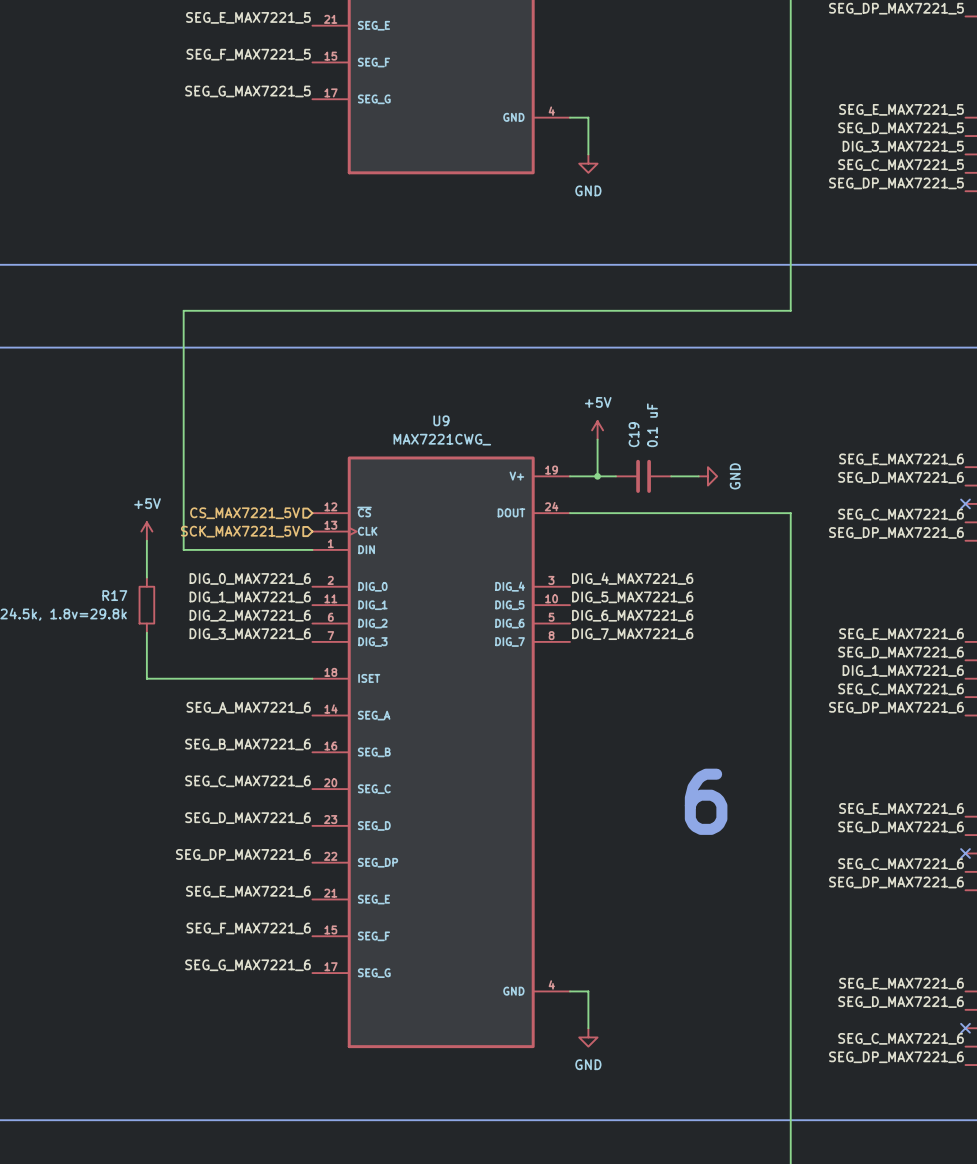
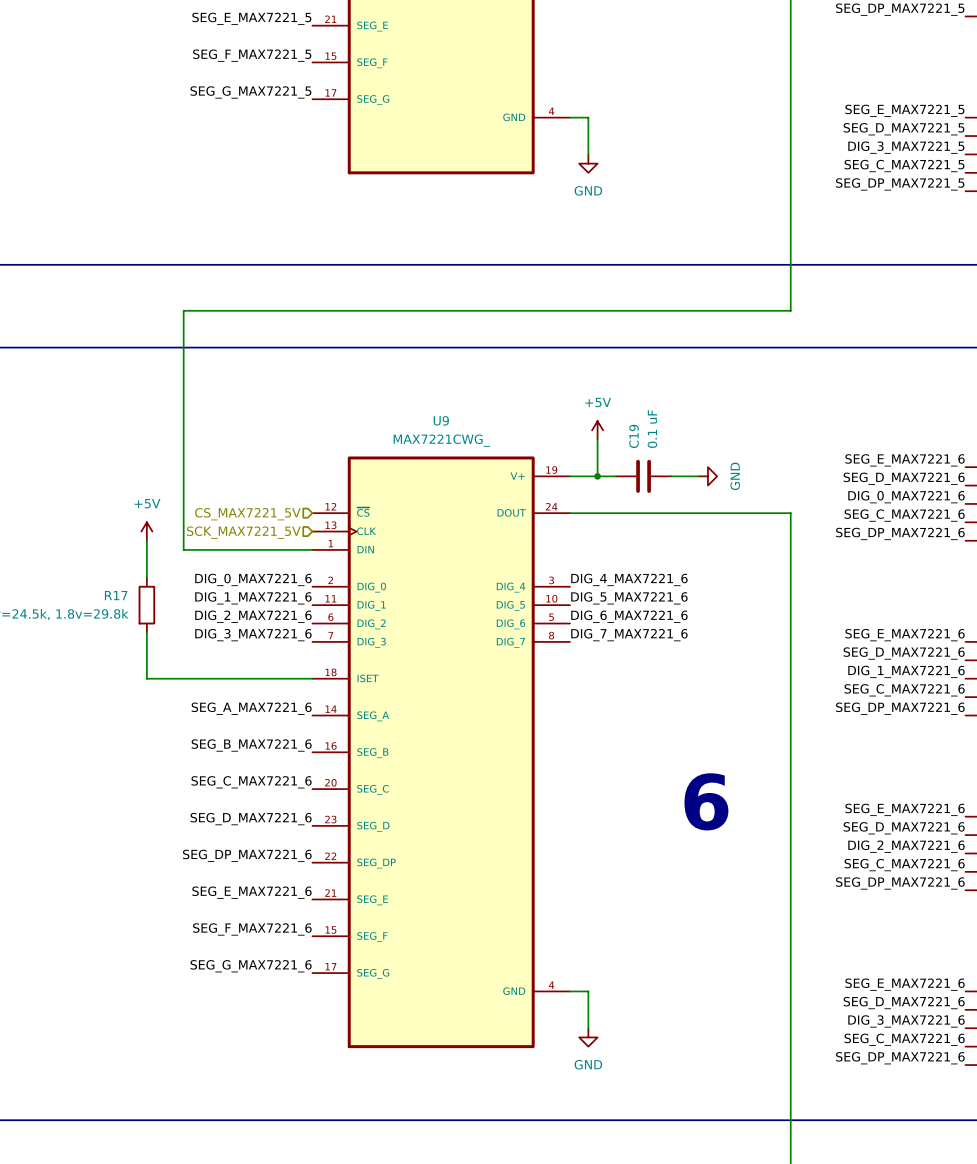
label: none -> DIG_0_MAX7221_6 (906, 497)
no-connect mark: (965, 503) -> none
label: none -> DIG_2_MAX7221_6 (906, 846)
no-connect mark: (965, 853) -> none
label: none -> DIG_3_MAX7221_6 (906, 1021)
no-connect mark: (965, 1028) -> none

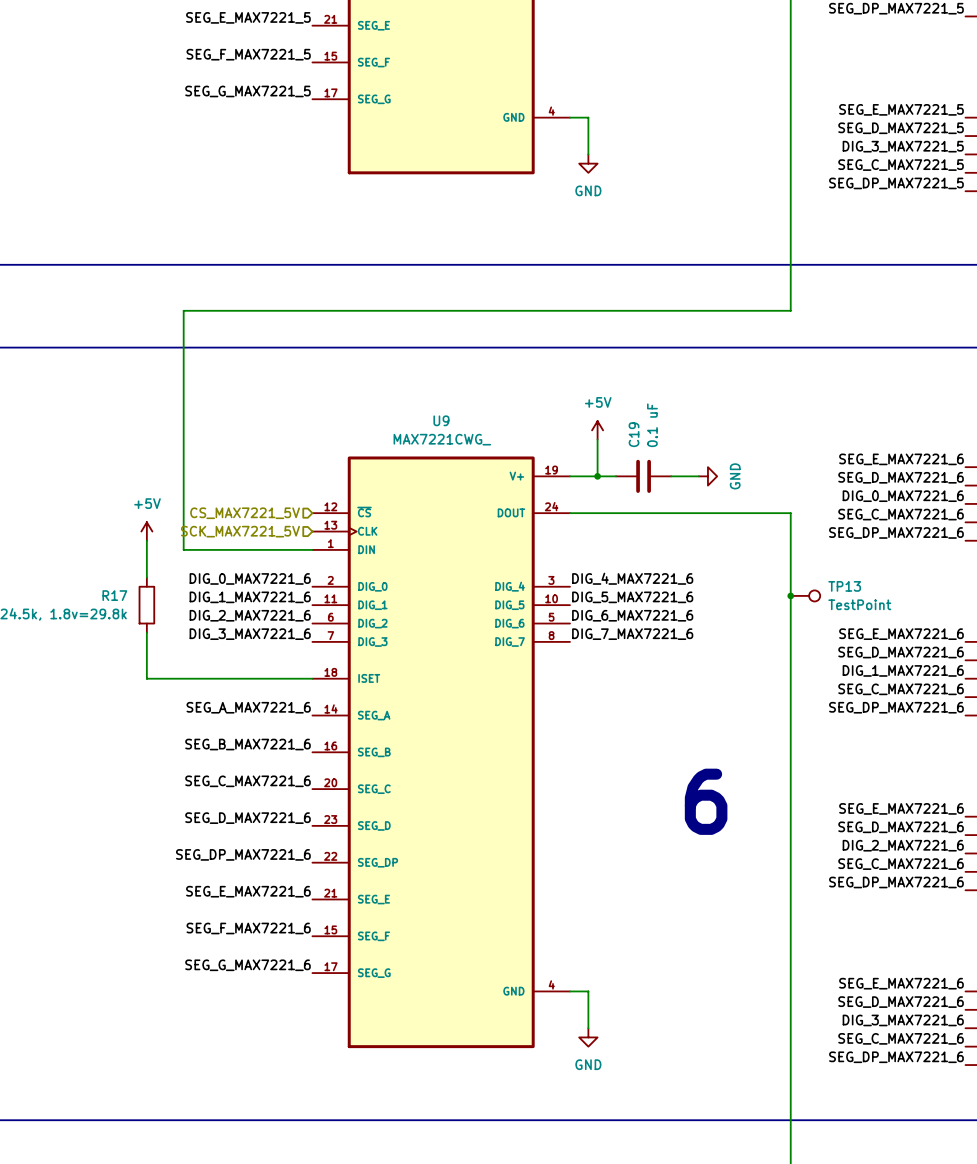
junction: none -> (790, 595)
TP13: none -> TestPoint (805, 595)

